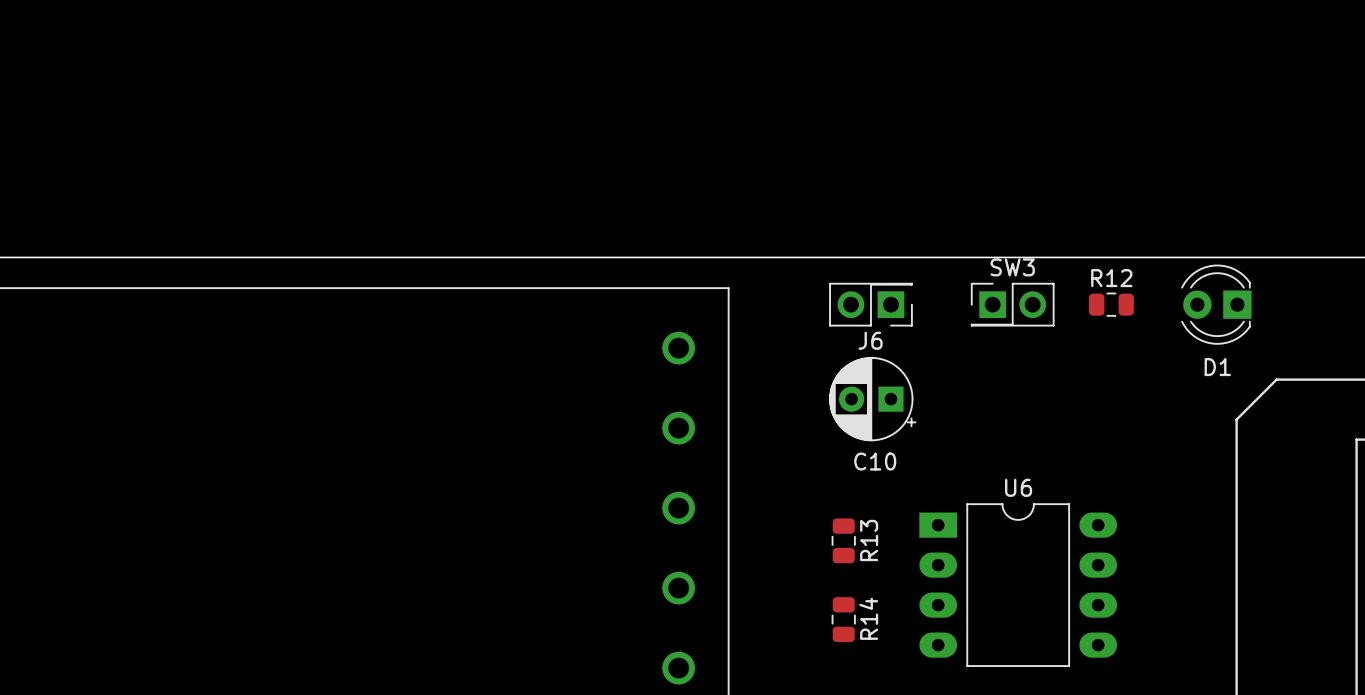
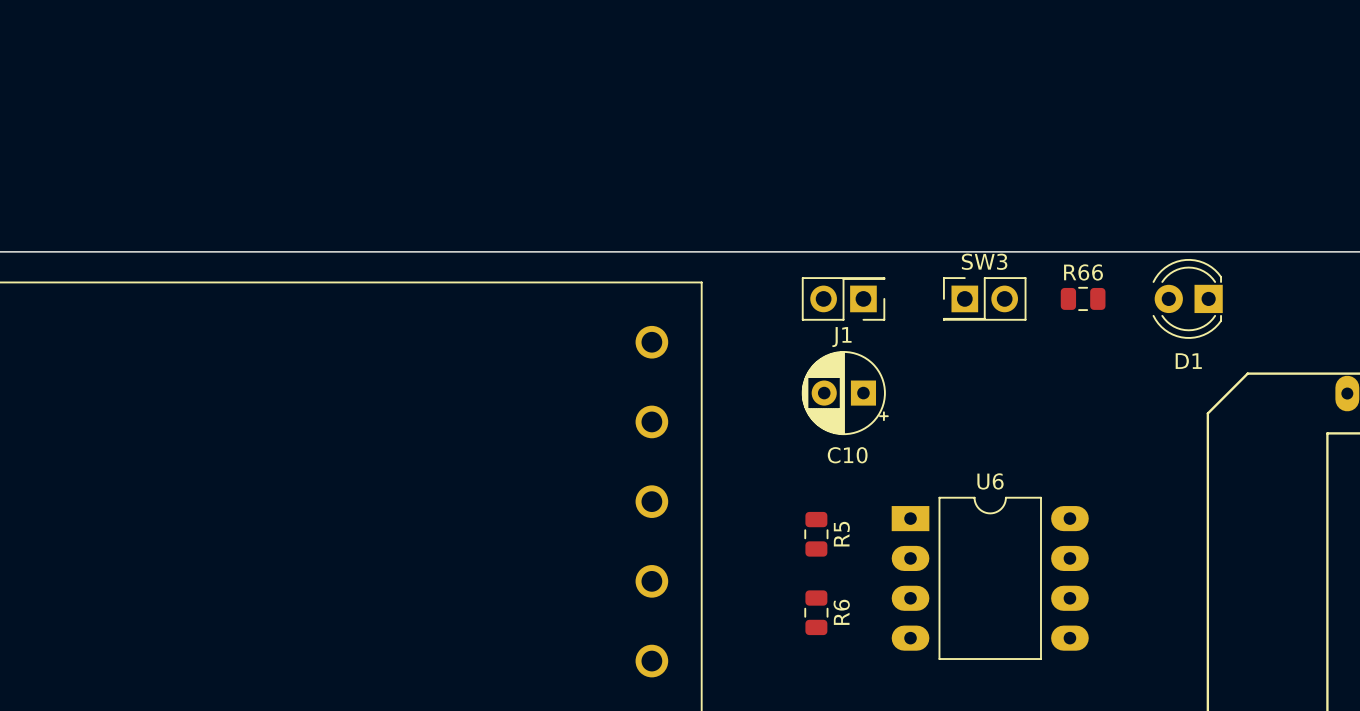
R12 name: R12 (1111, 278) -> R66 (1083, 272)
J6 name: J6 (870, 340) -> J1 (841, 337)
R13 name: R13 (869, 540) -> R5 (841, 534)
R14 name: R14 (868, 618) -> R6 (841, 612)

